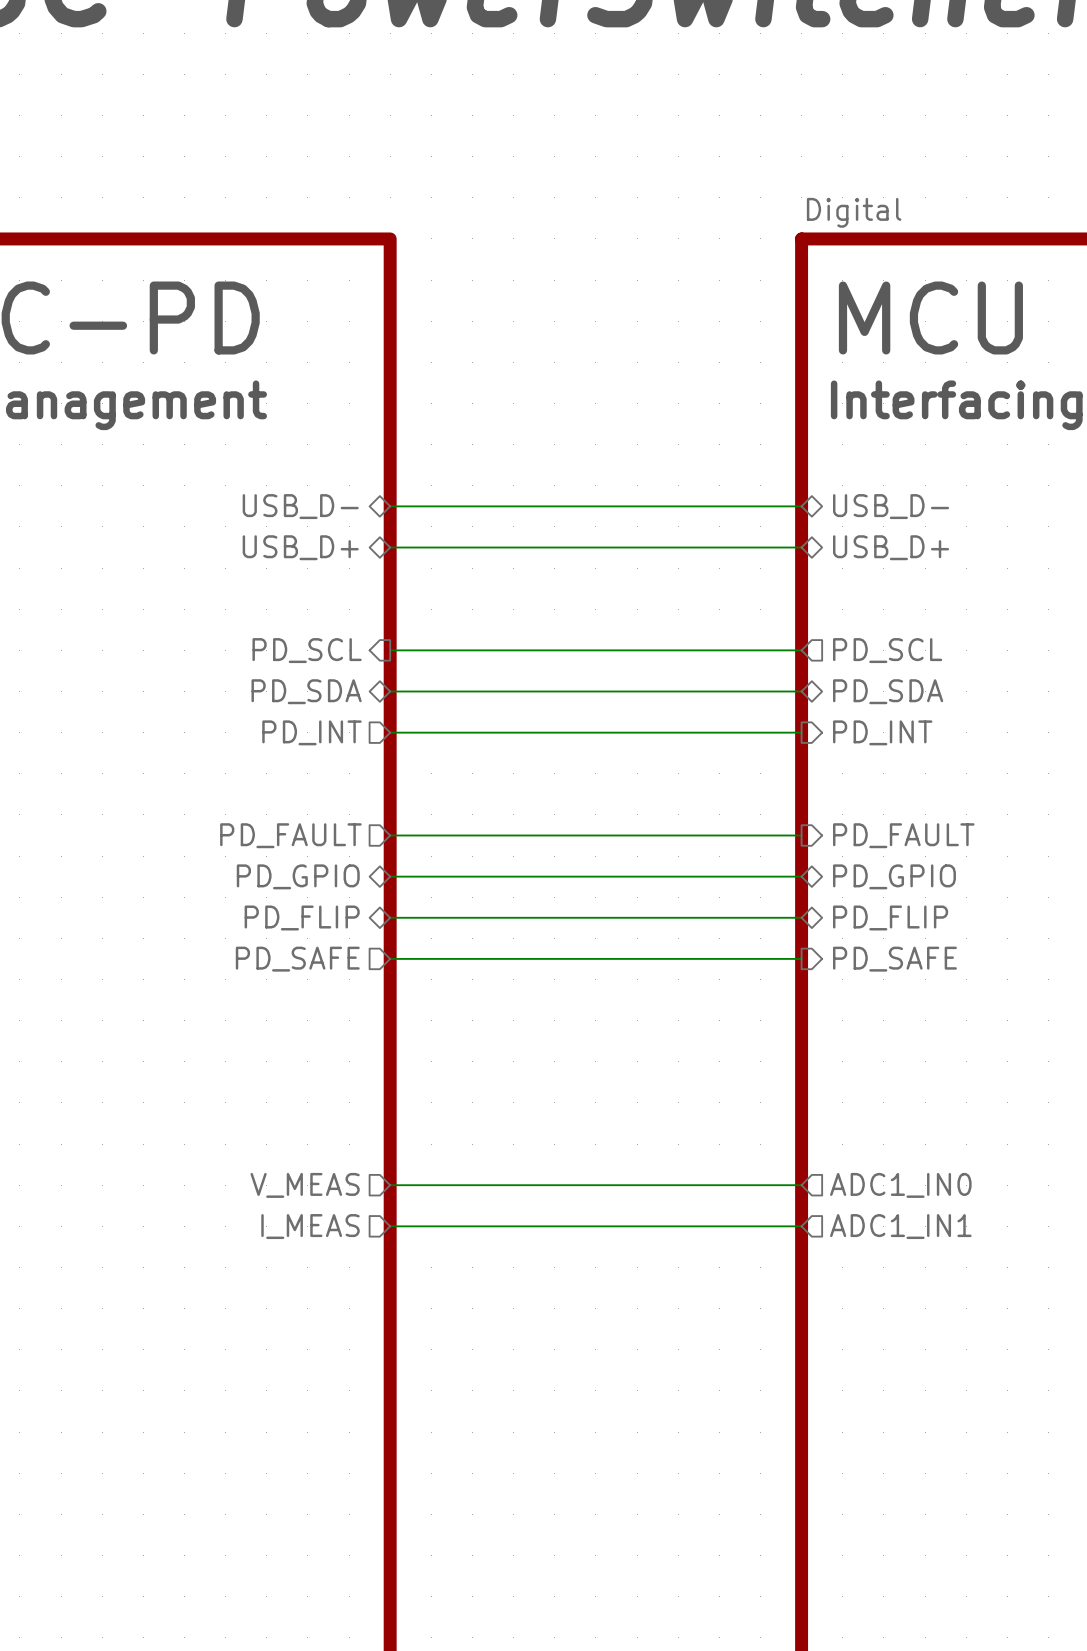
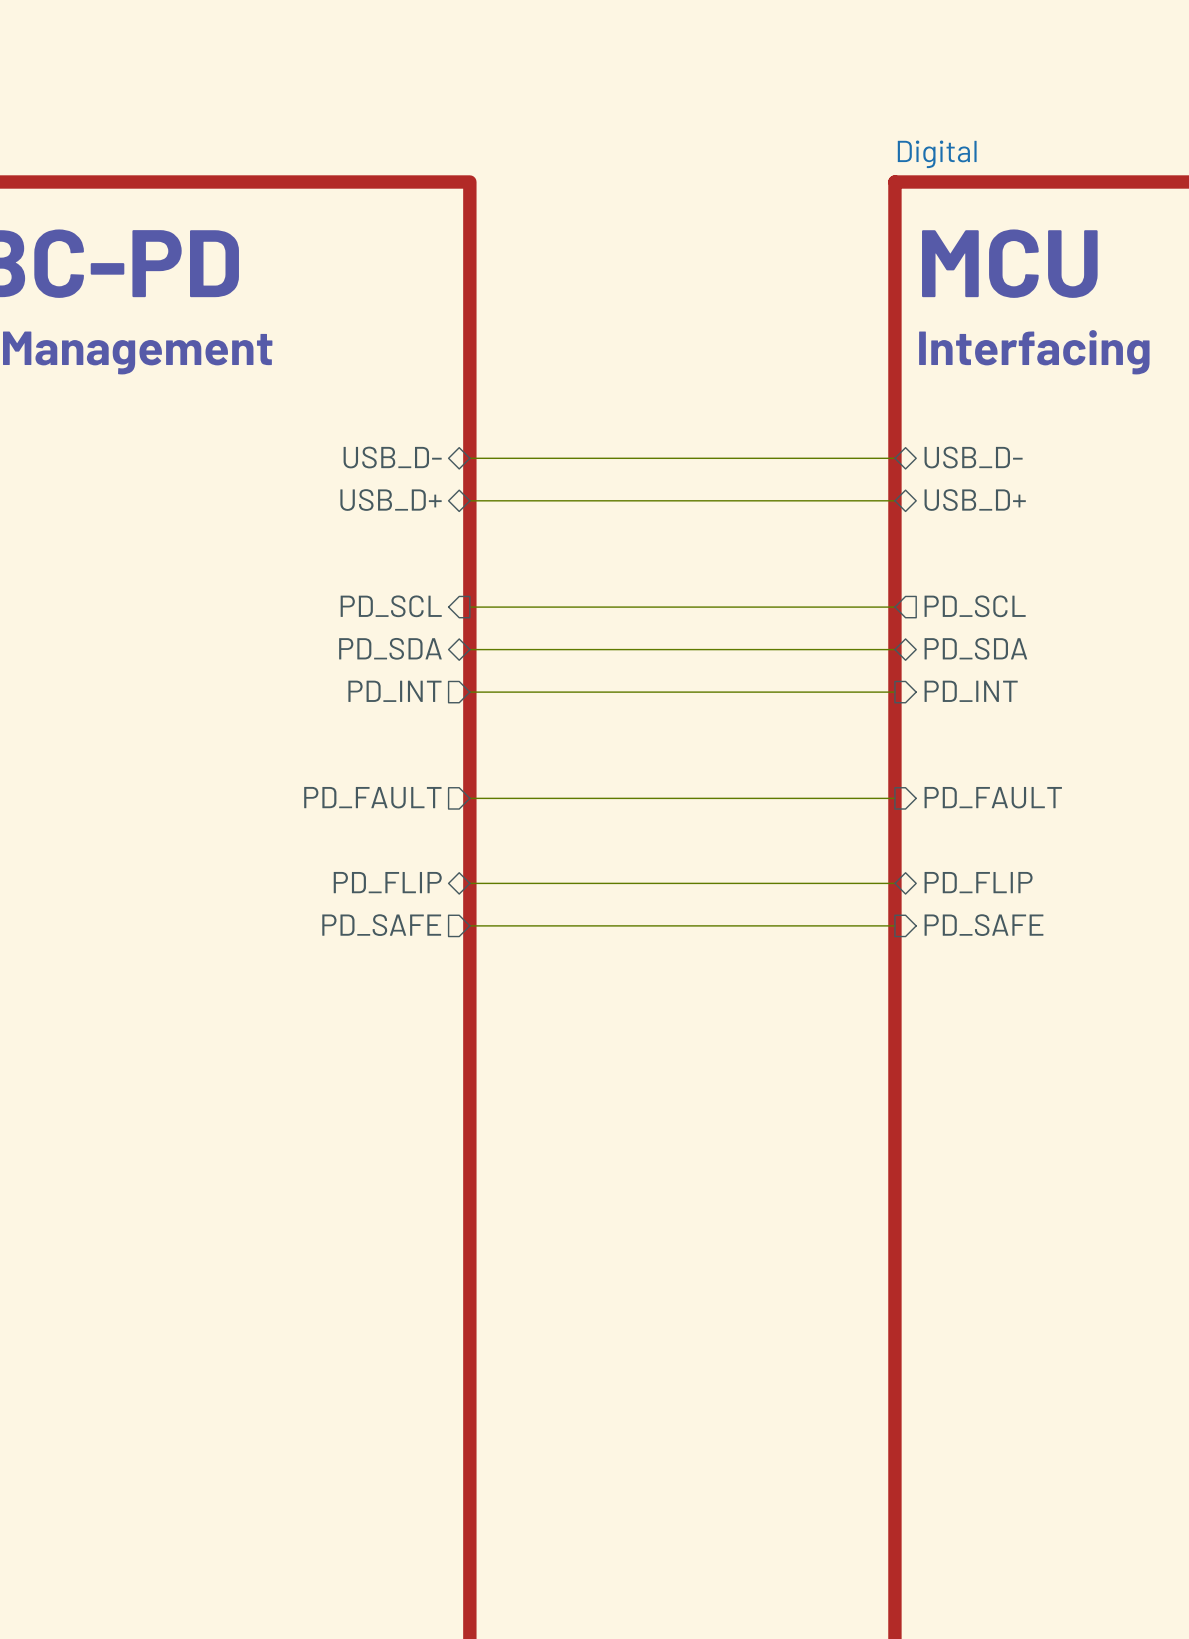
sheet pin: PD_GPIO (298, 876) -> none
wire: (390, 876) (801, 876) -> none
sheet pin: PD_GPIO (894, 876) -> none
sheet pin: V_MEAS (305, 1185) -> none
wire: (390, 1185) (801, 1185) -> none
sheet pin: ADC1_IN0 (900, 1185) -> none
sheet pin: I_MEAS (310, 1226) -> none
wire: (390, 1226) (801, 1226) -> none
sheet pin: ADC1_IN1 (900, 1226) -> none

